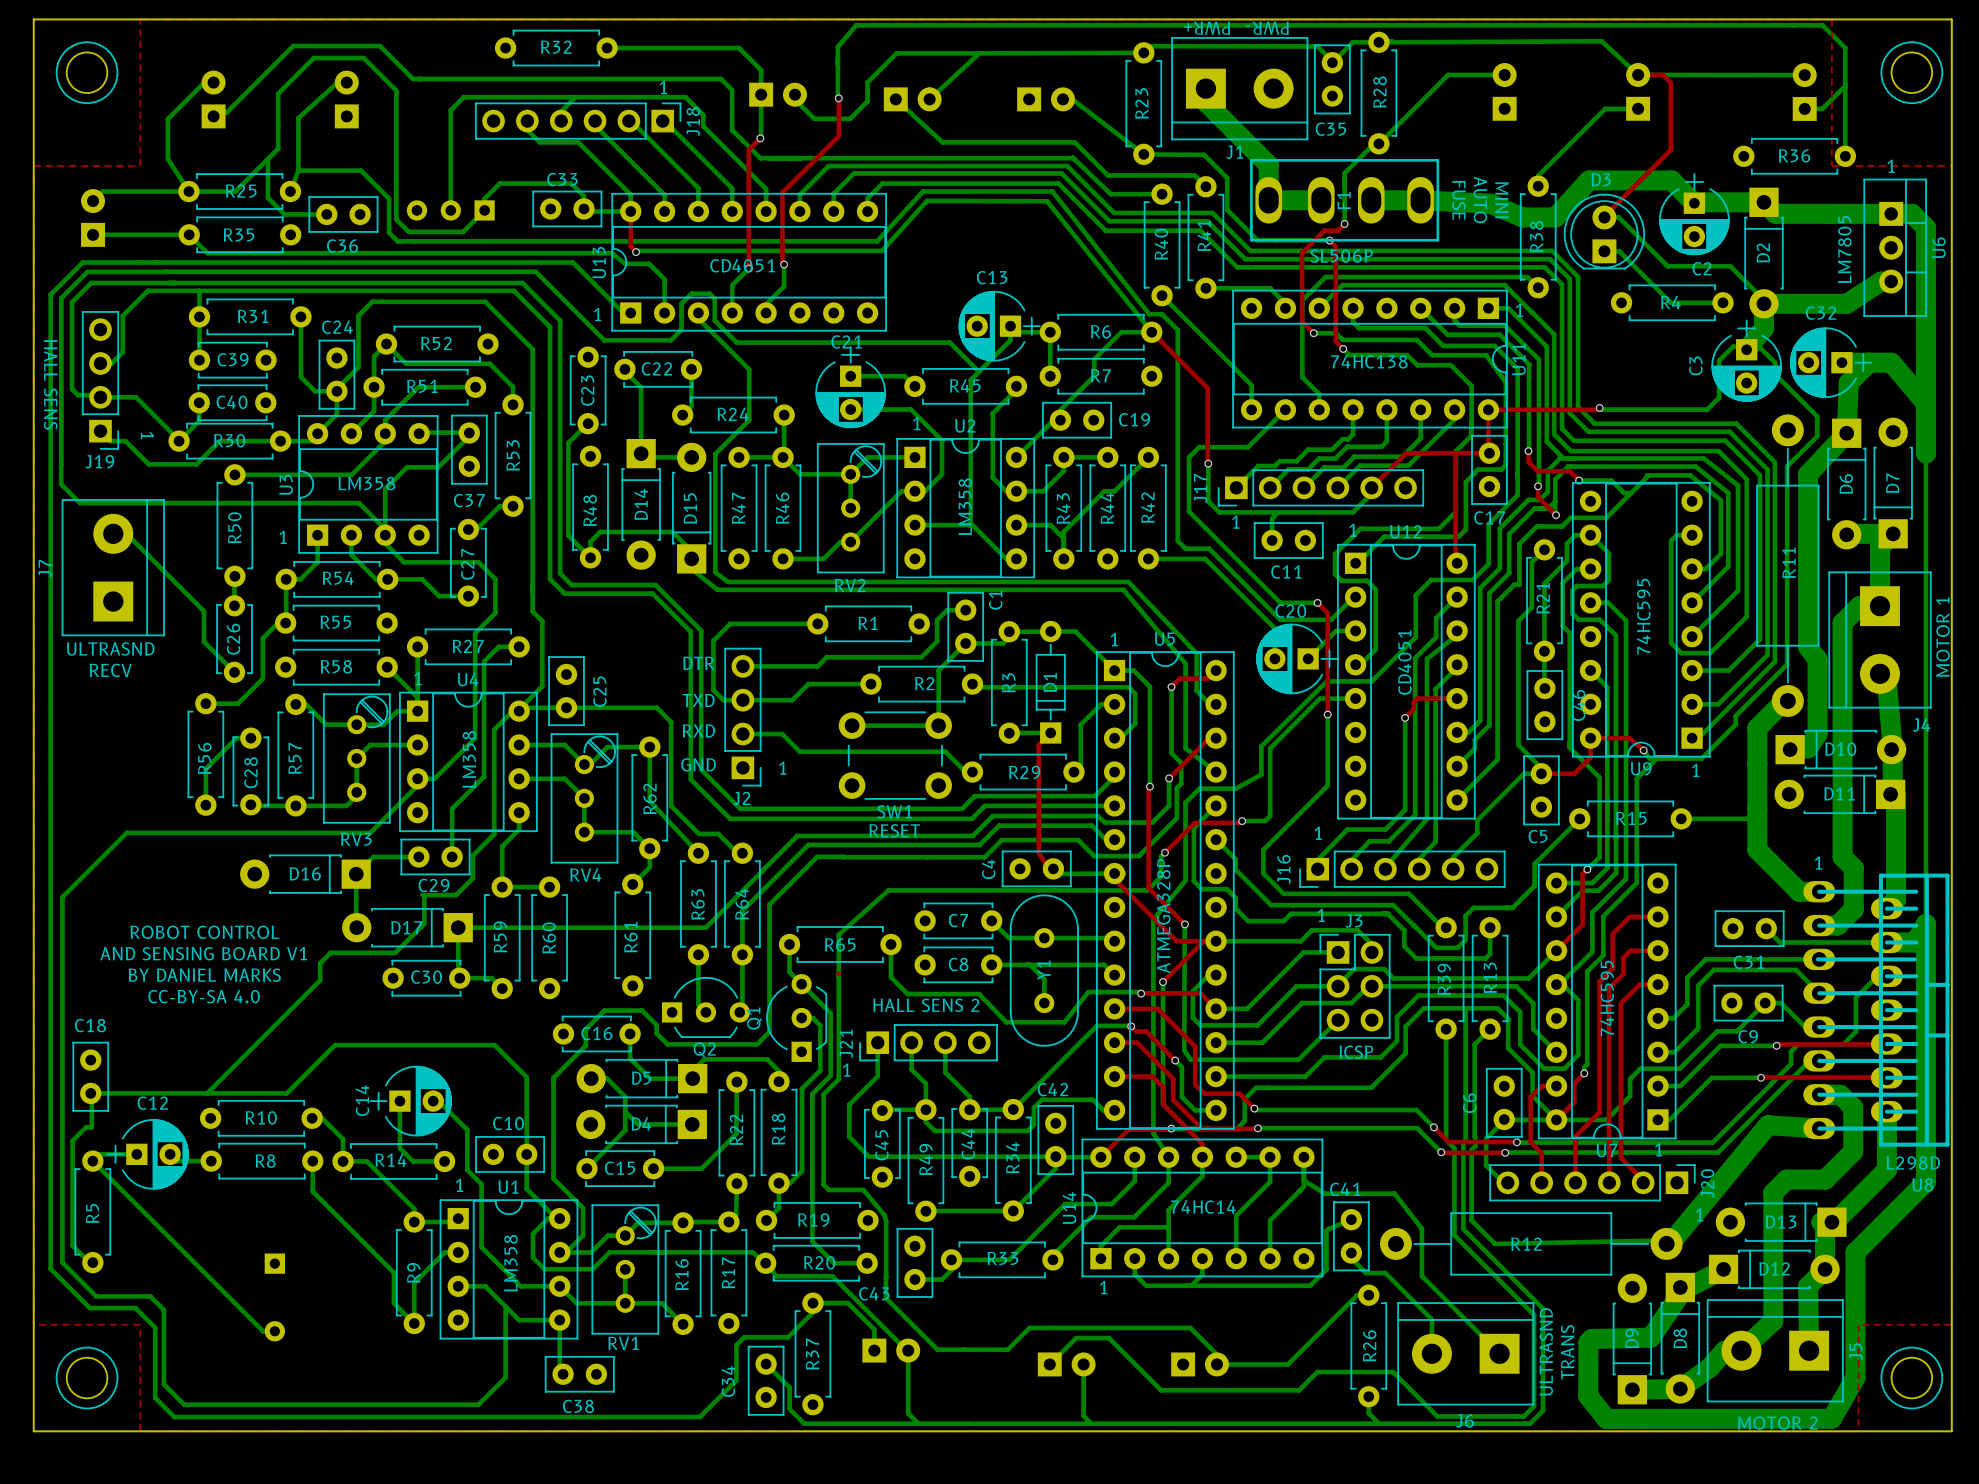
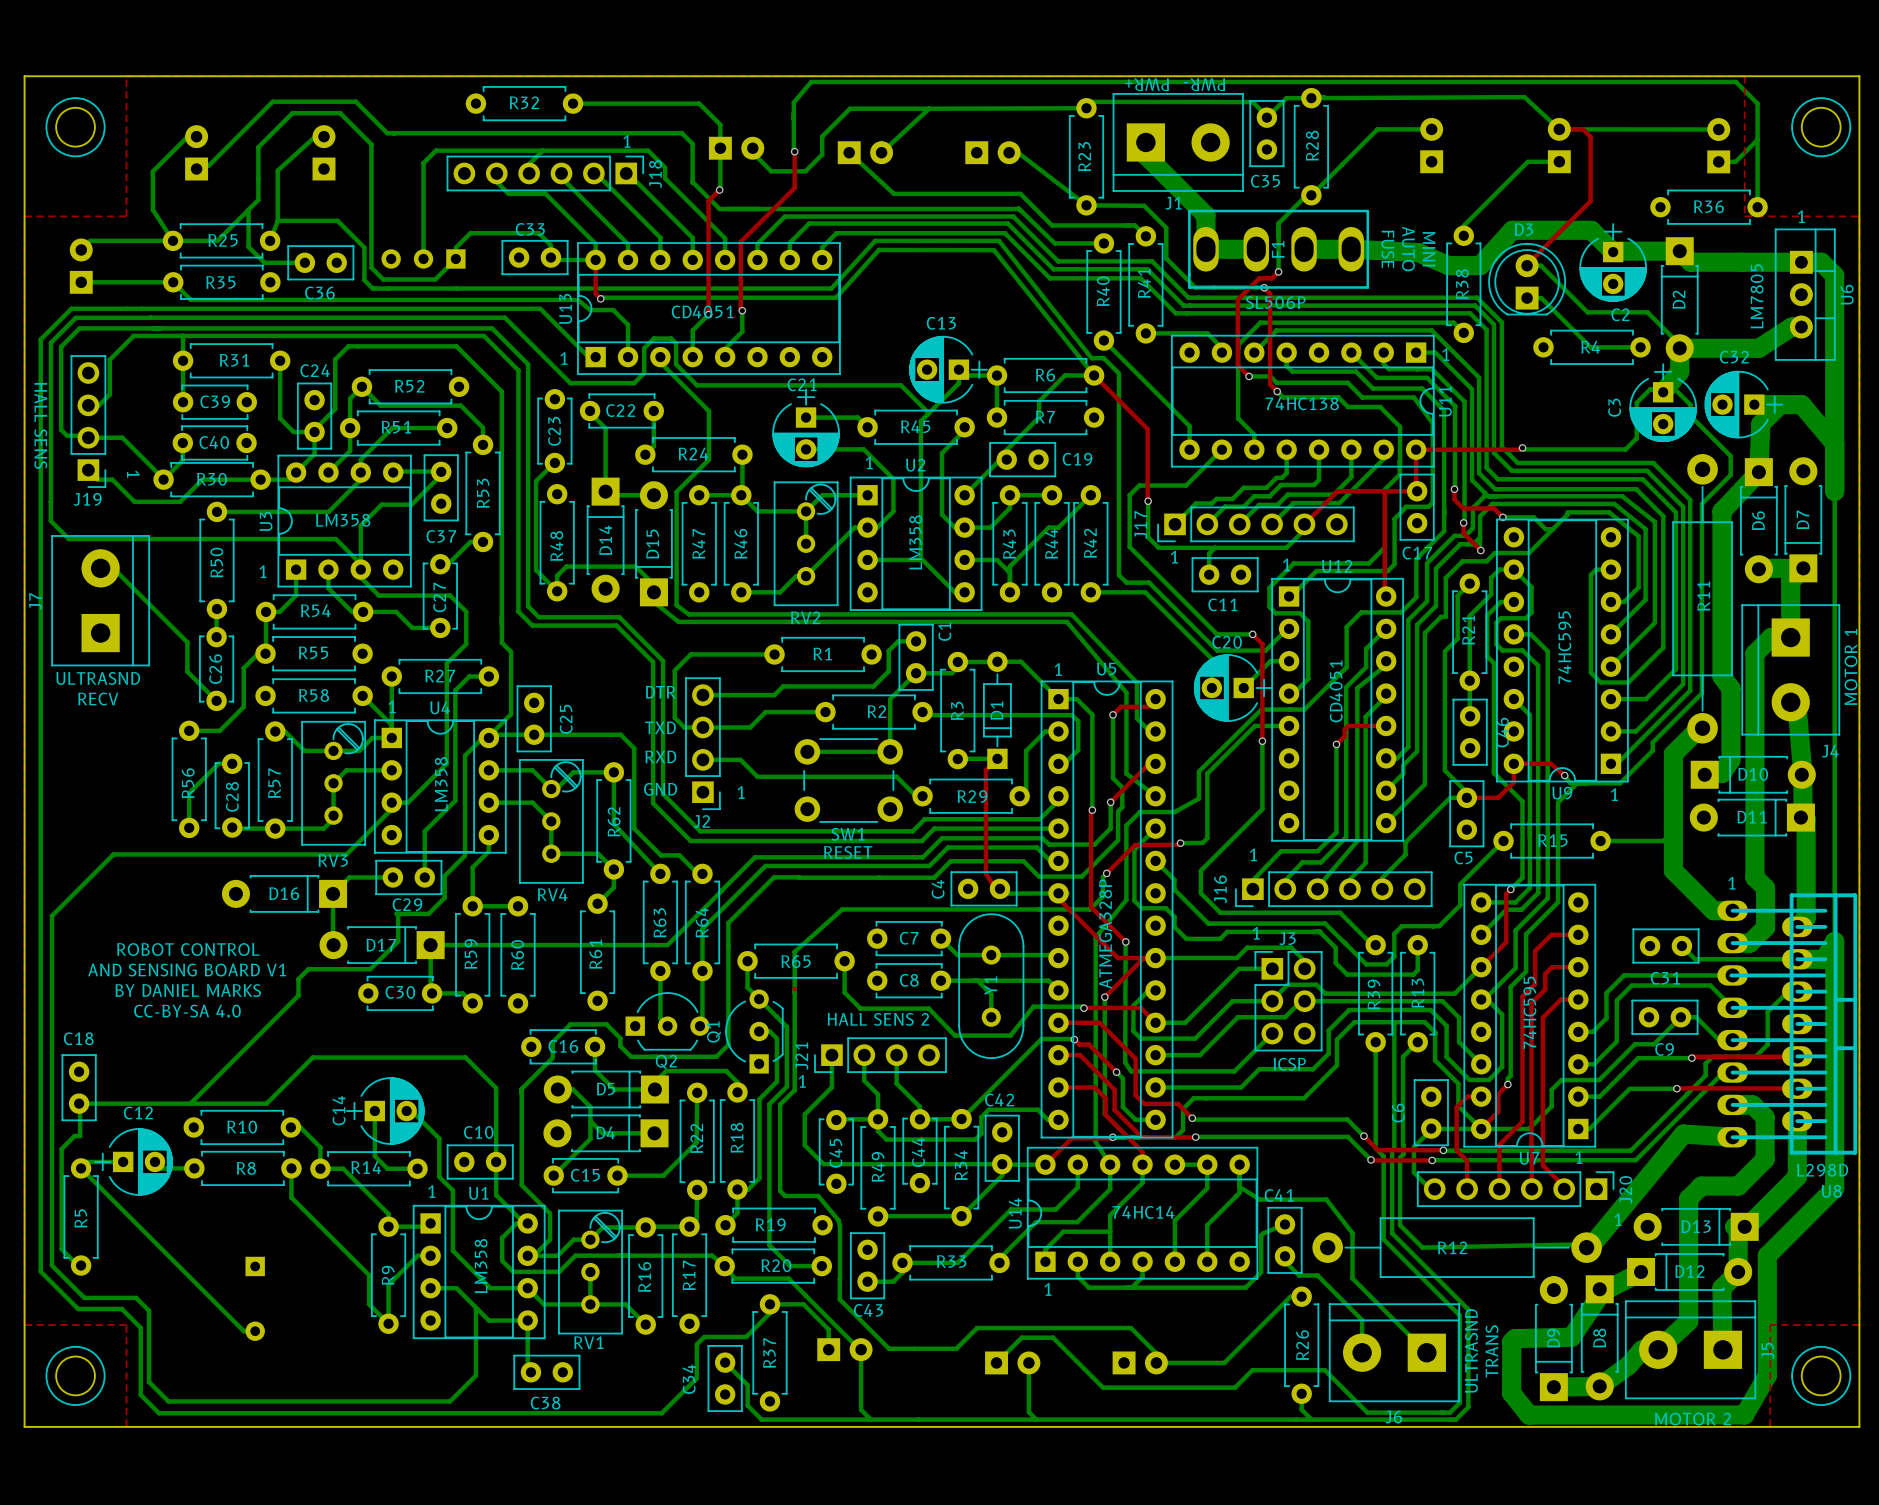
C43 name position: C43 (874, 1293) -> C43 (868, 1310)

